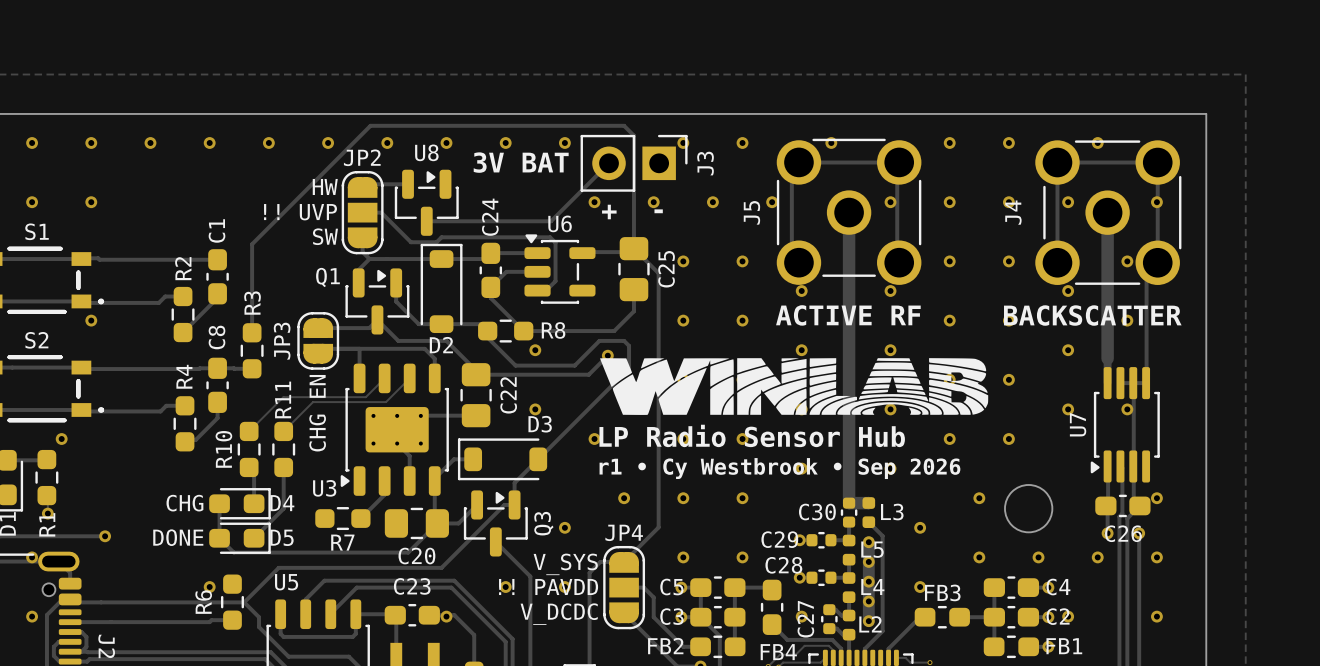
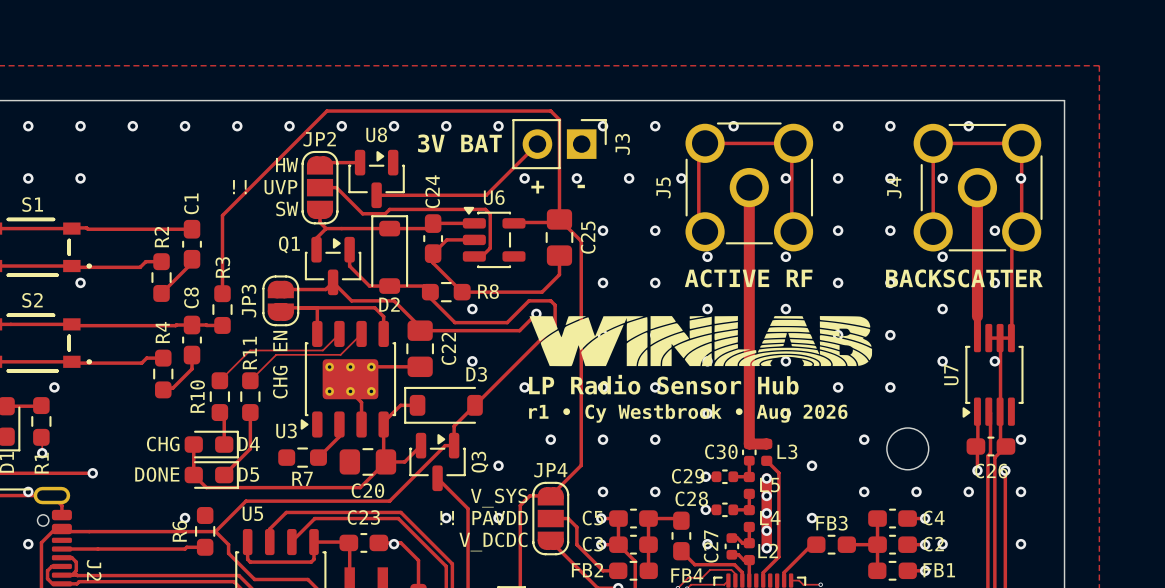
text: r1 • Cy Westbrook • Sep 2026 (779, 468) -> r1 • Cy Westbrook • Aug 2026 (688, 413)

